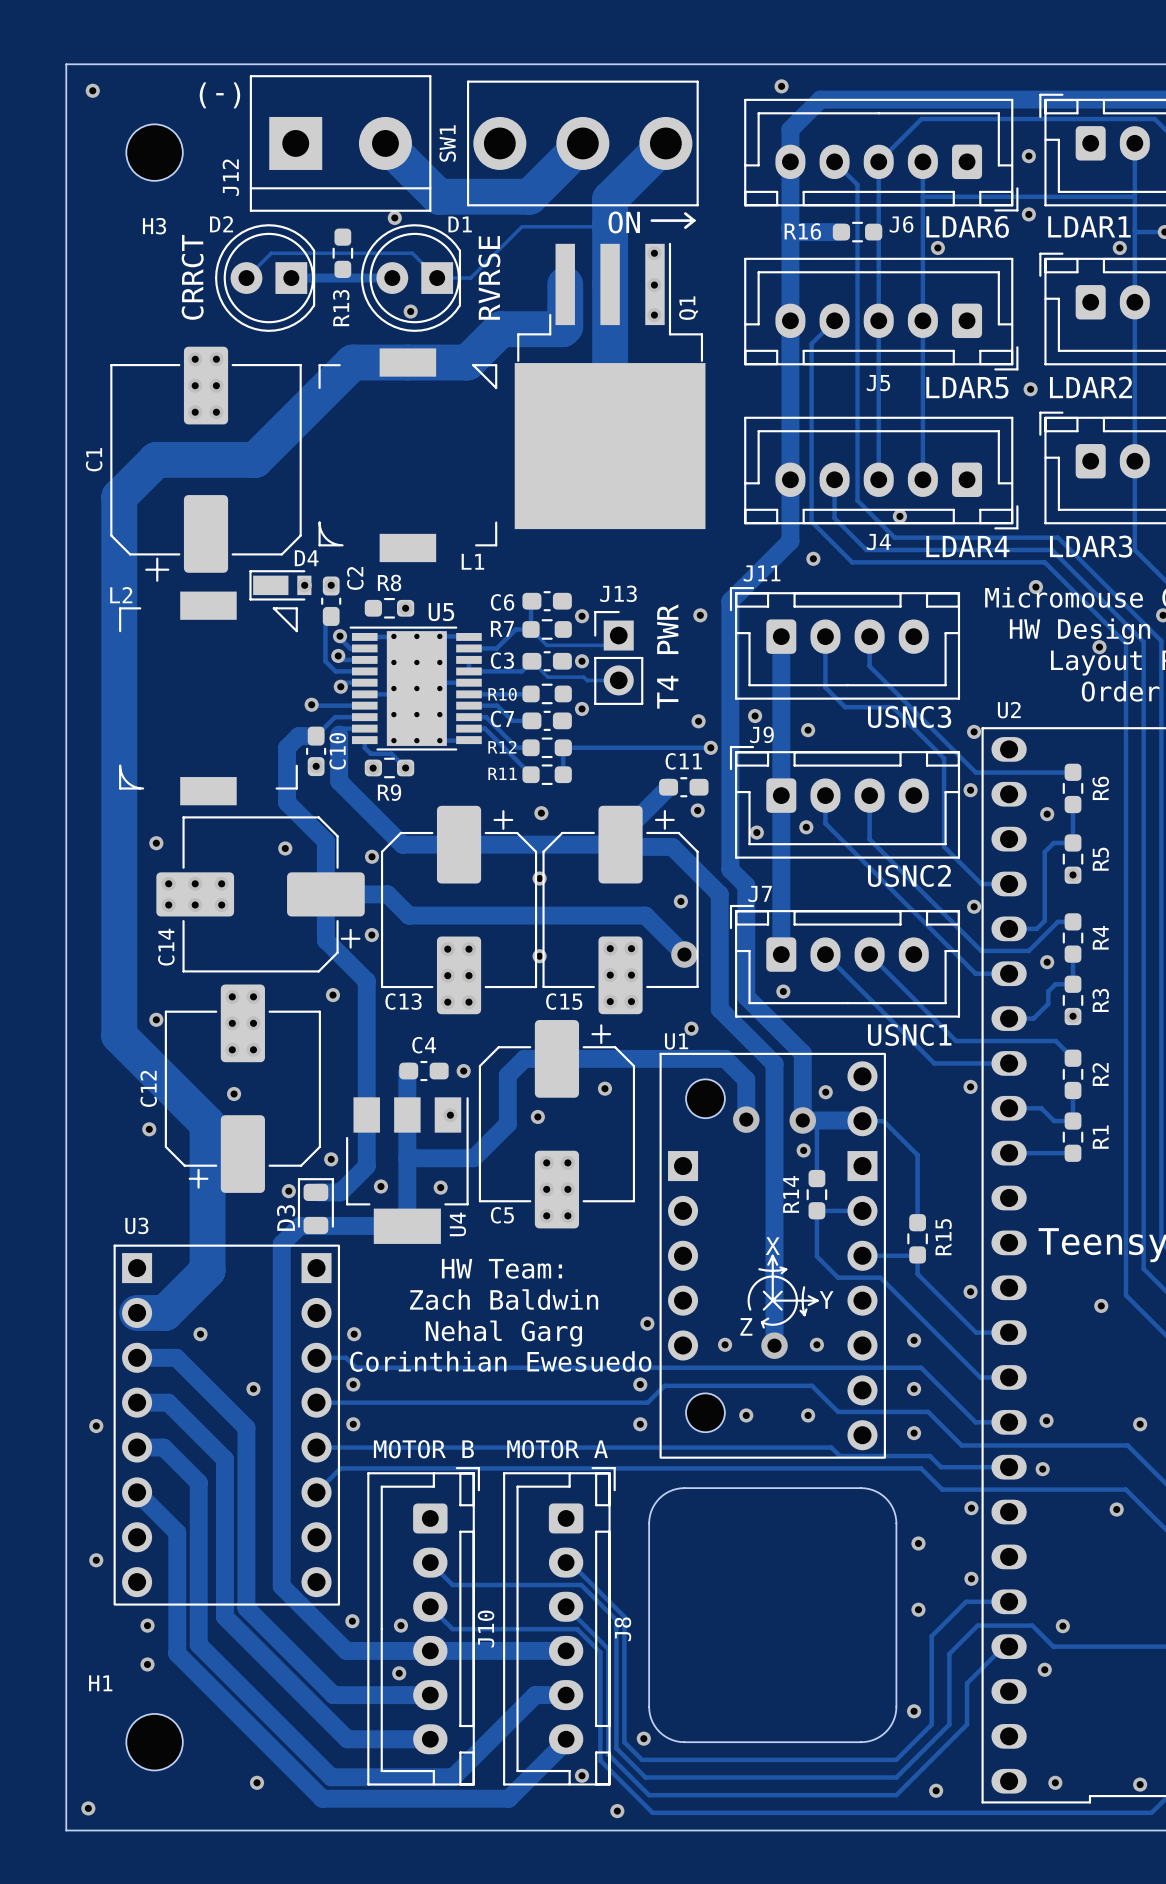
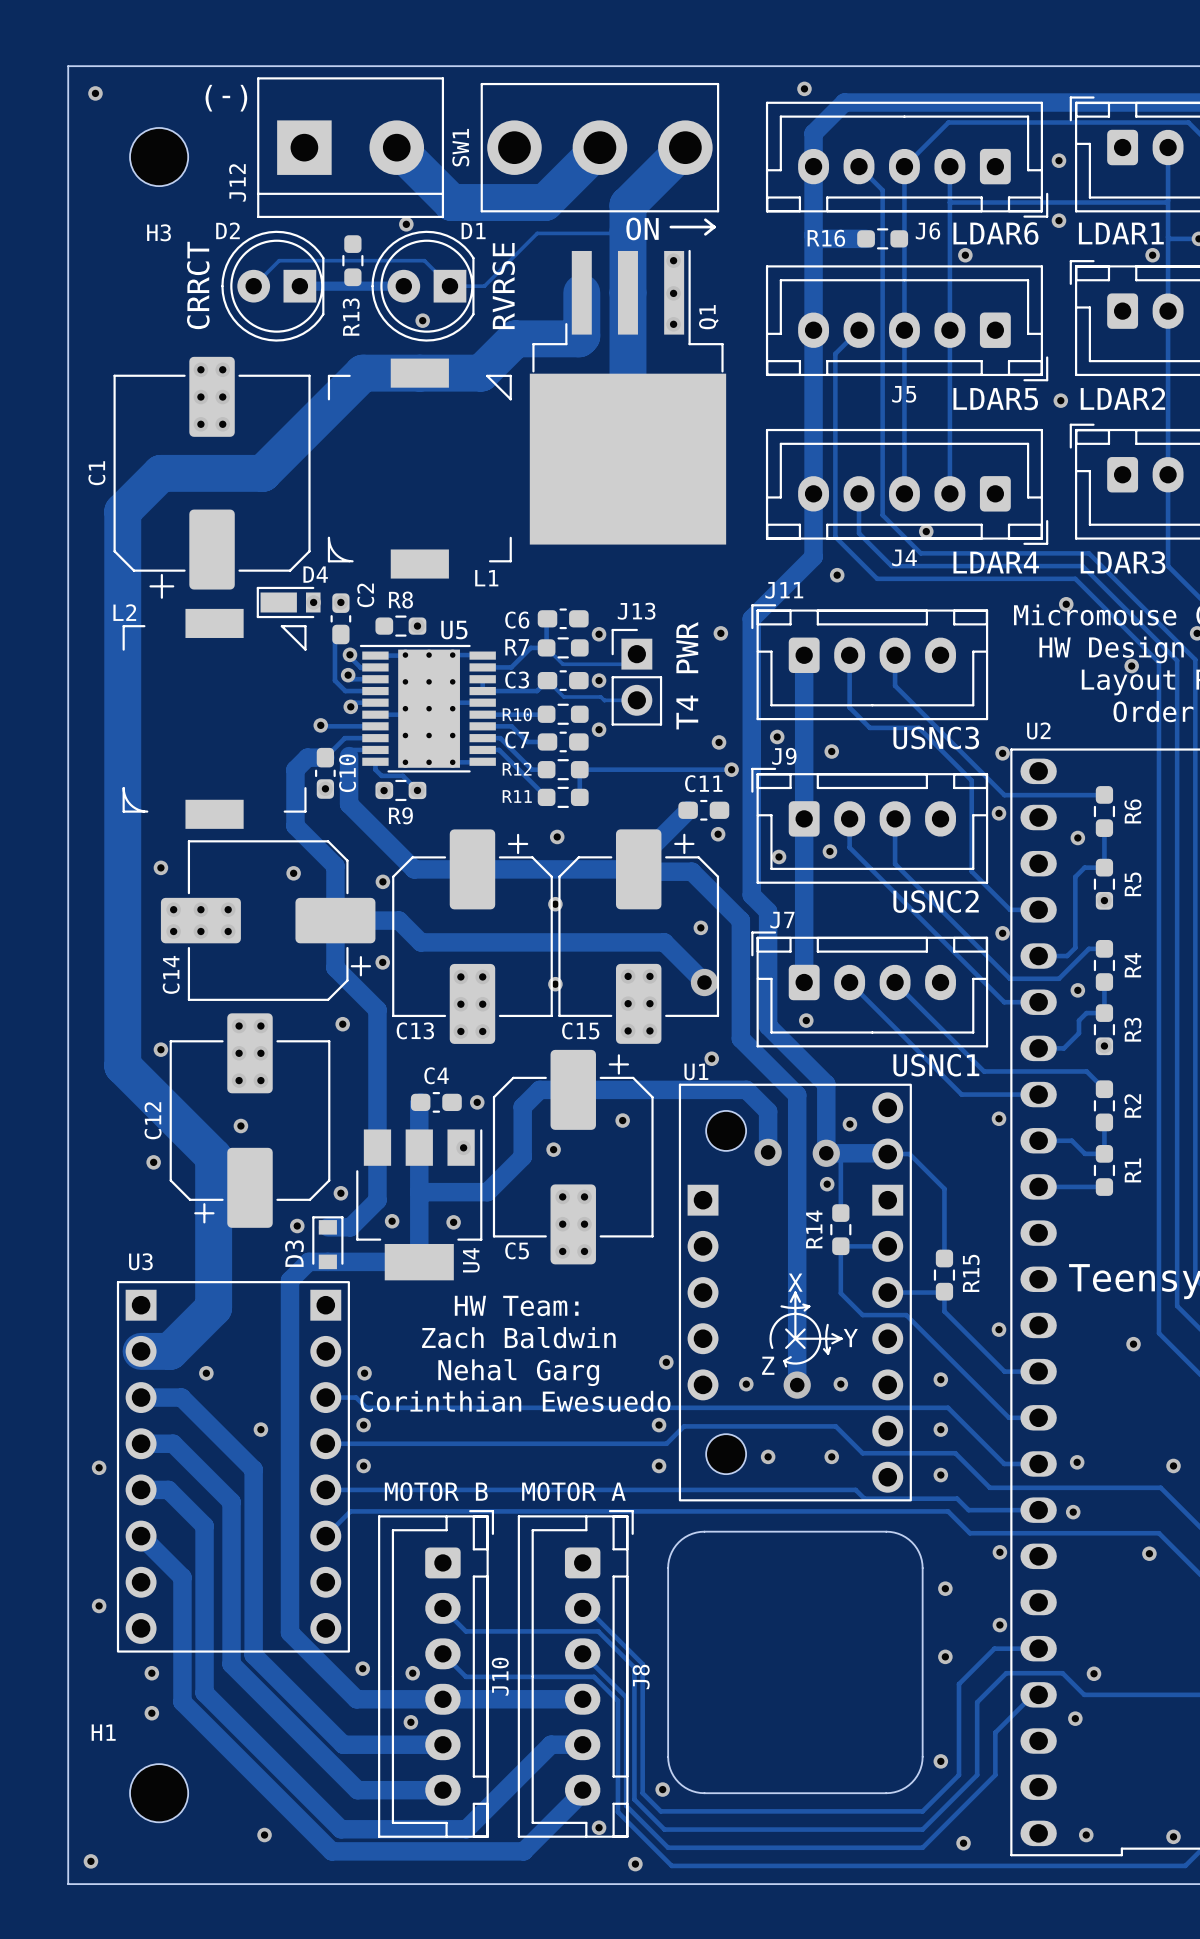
D3 footprint: [297, 1178, 334, 1235] -> [312, 1216, 344, 1270]

